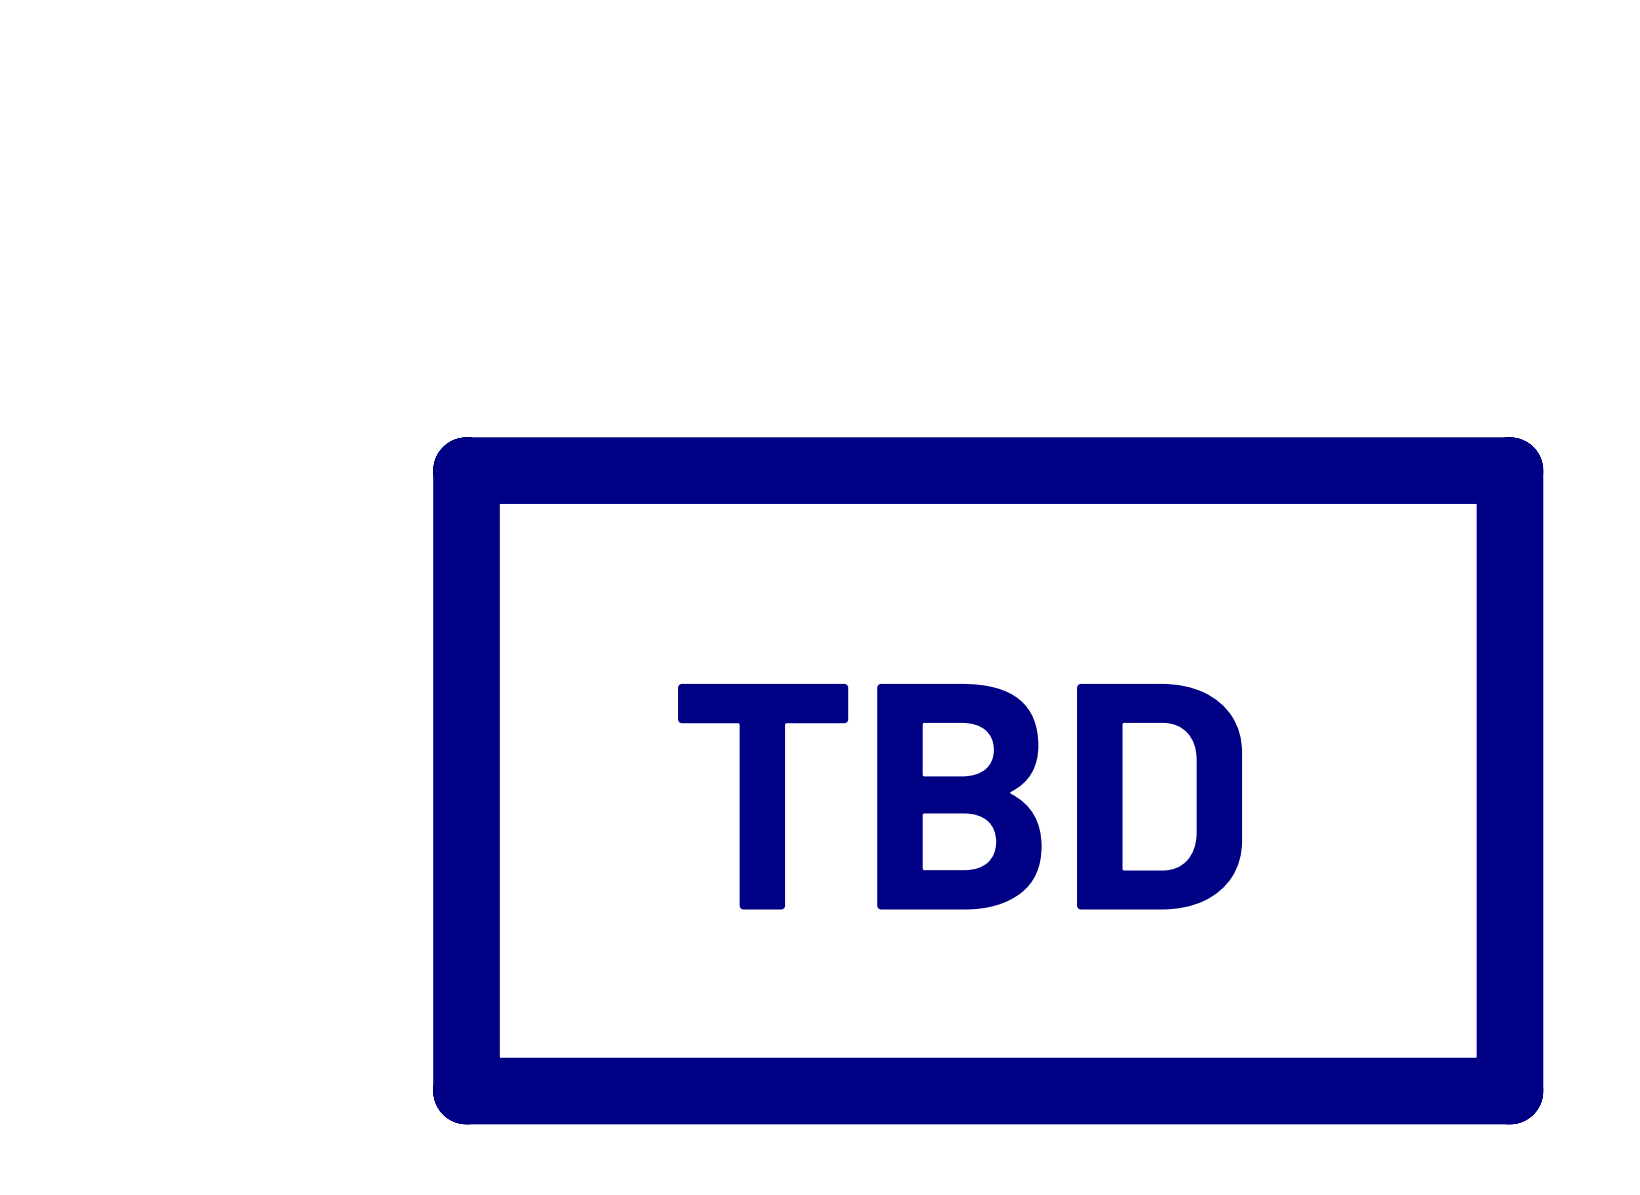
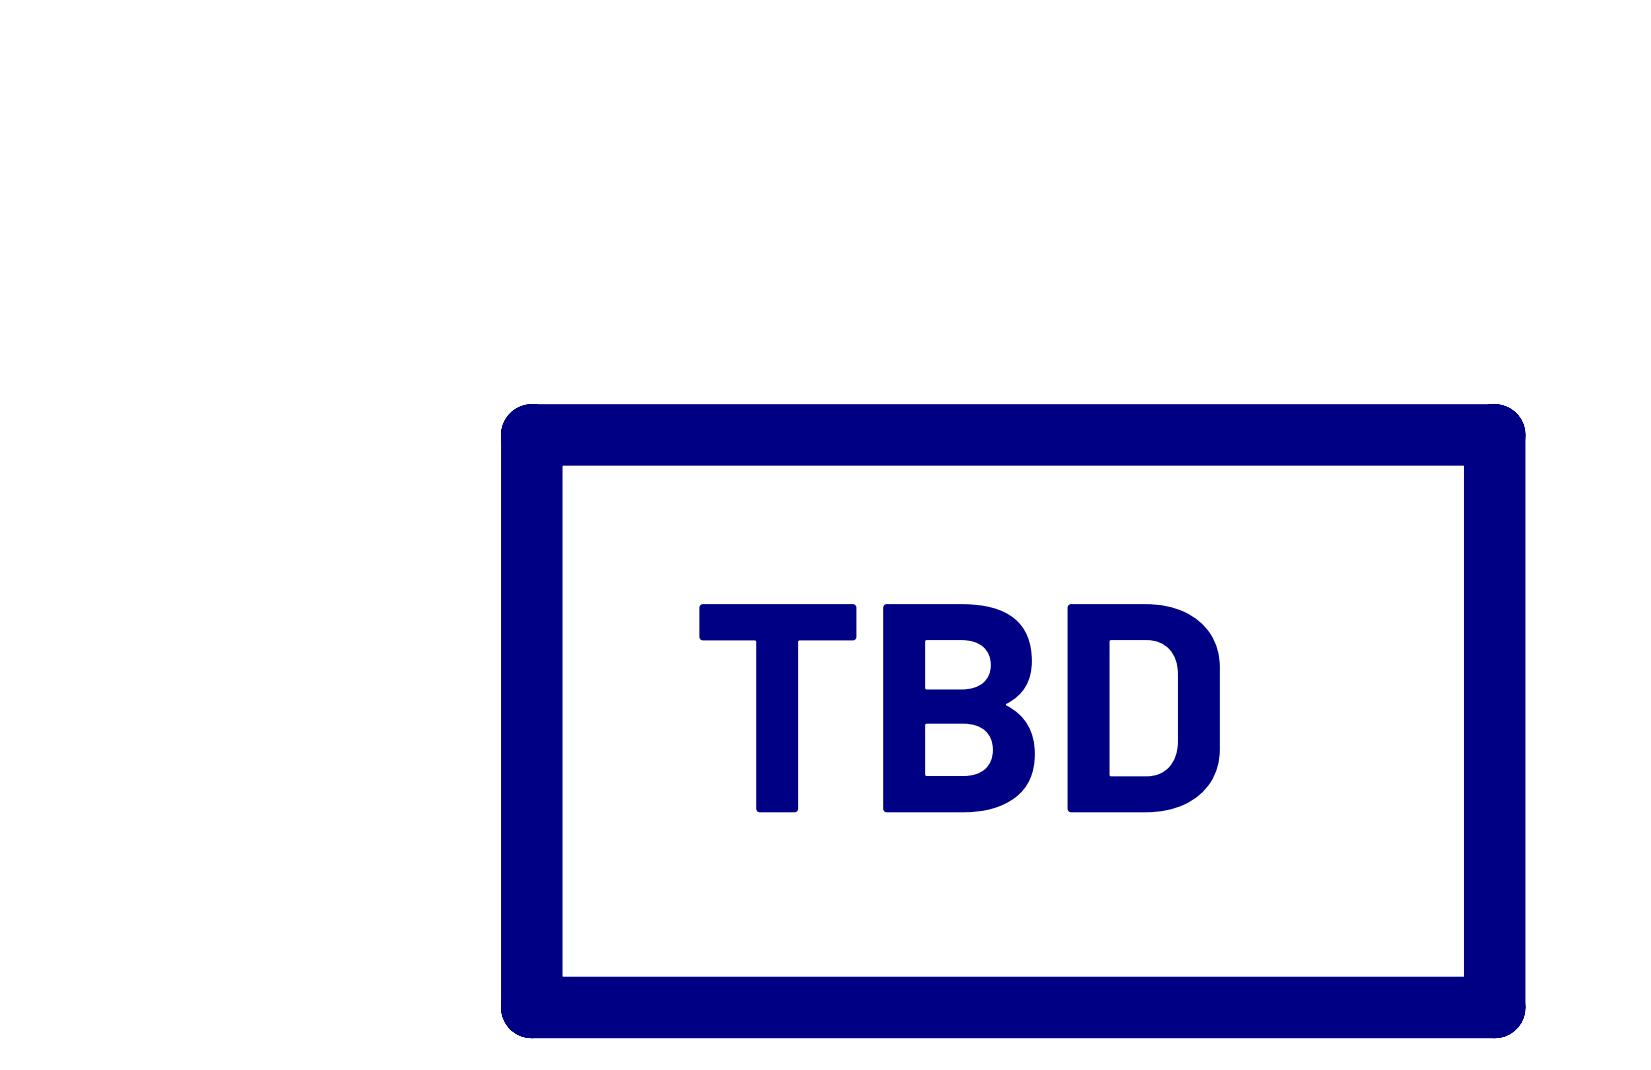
text position: TBD (960, 796) -> TBD (959, 708)

